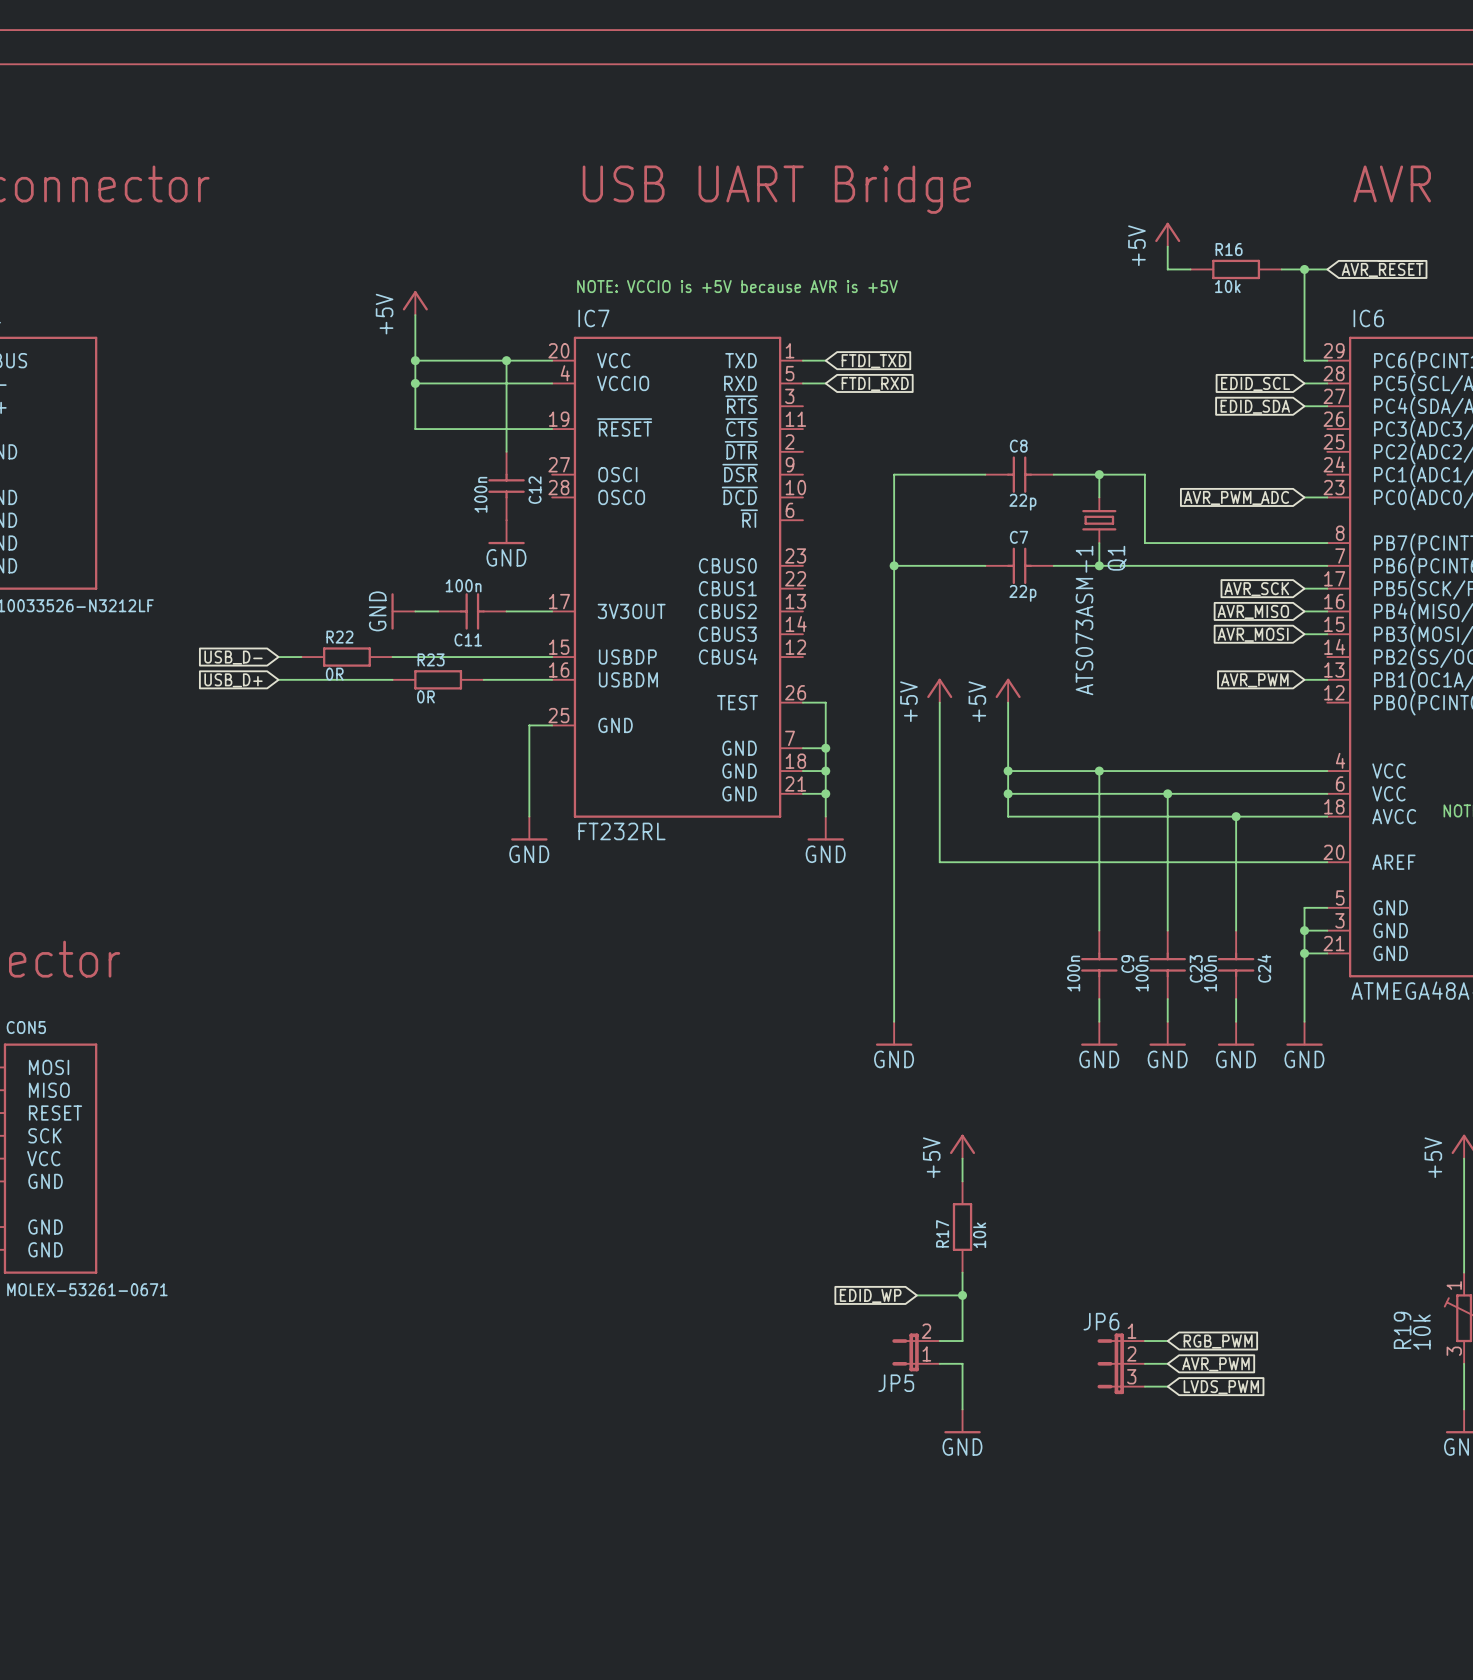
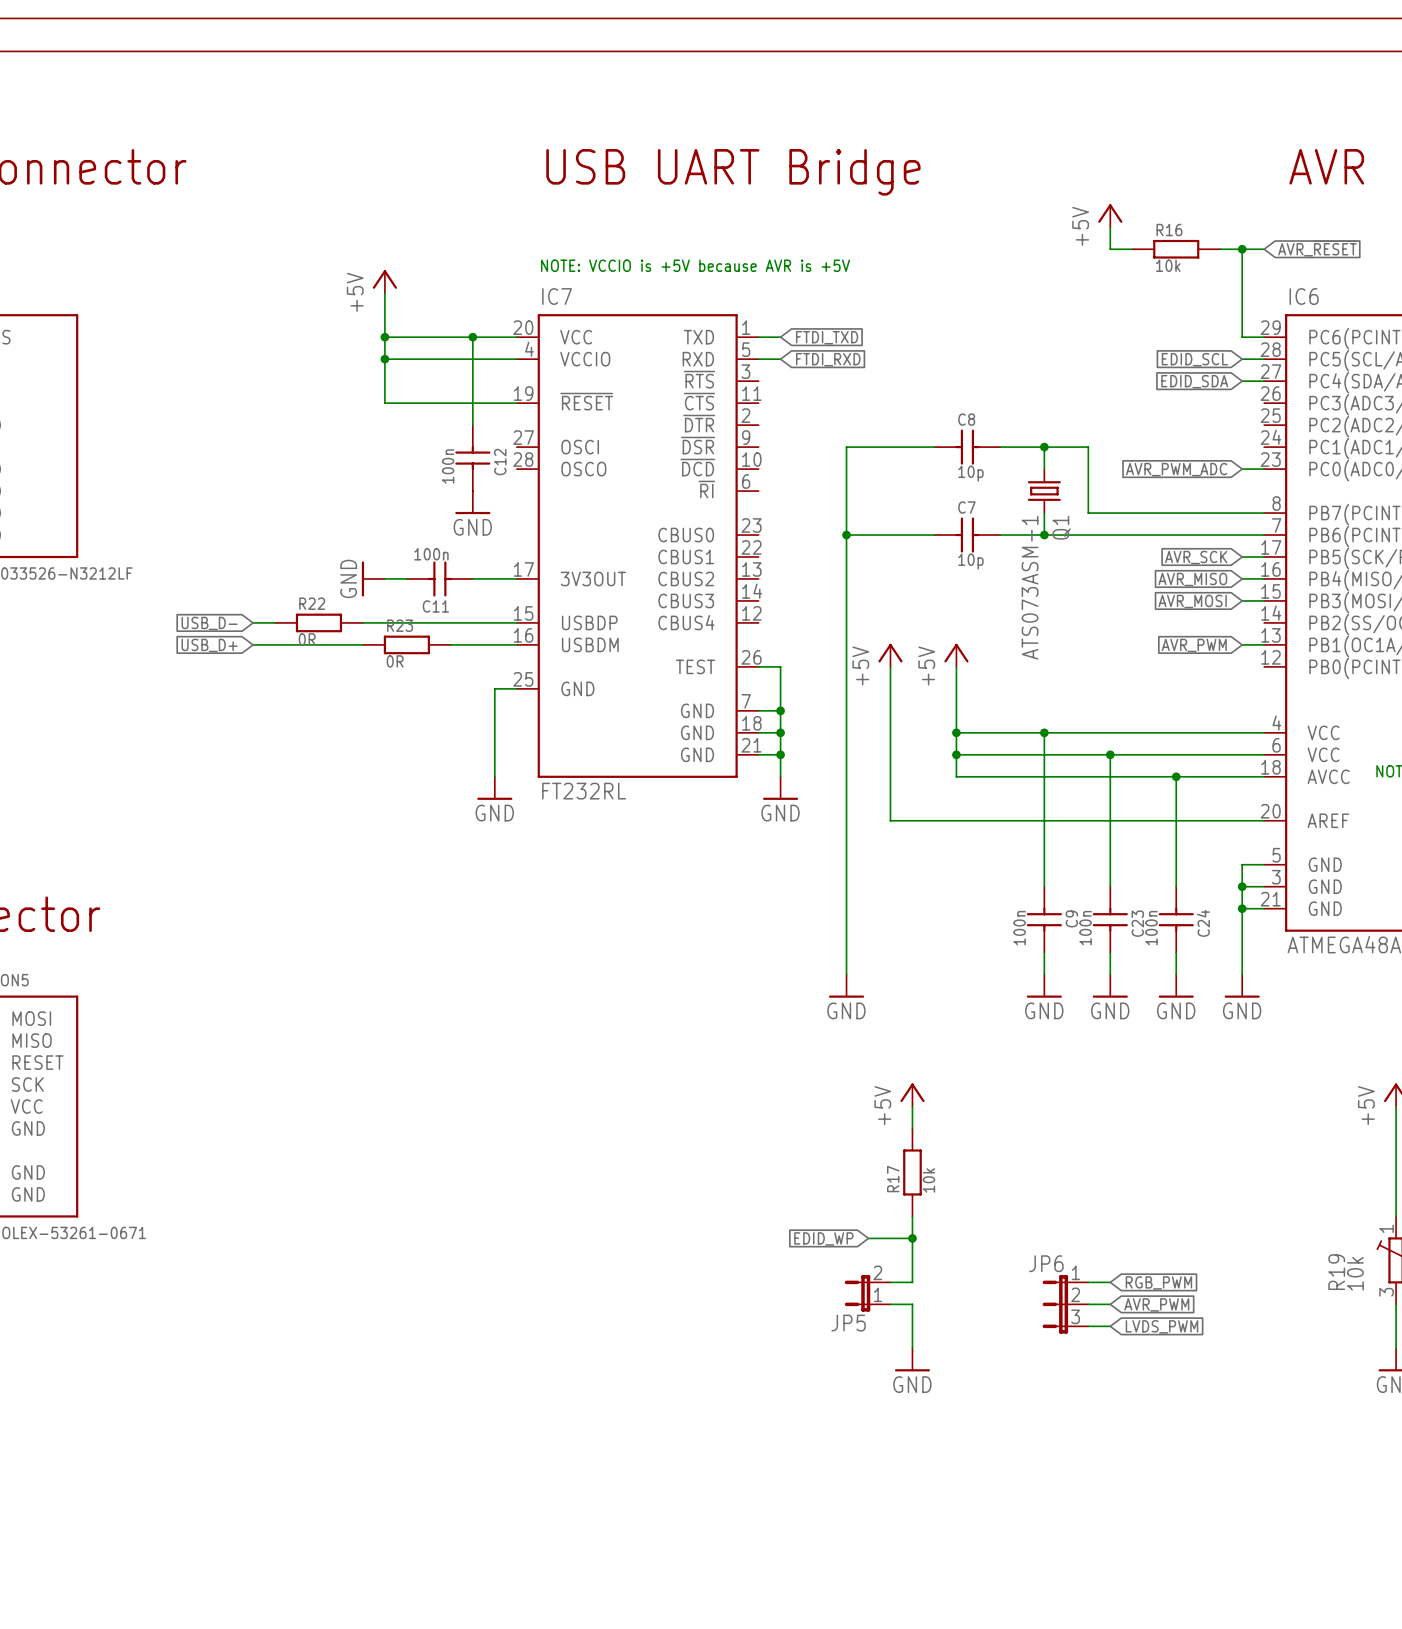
C8 value: 22p (1022, 502) -> 10p (970, 473)
C7 value: 22p (1022, 593) -> 10p (970, 561)

